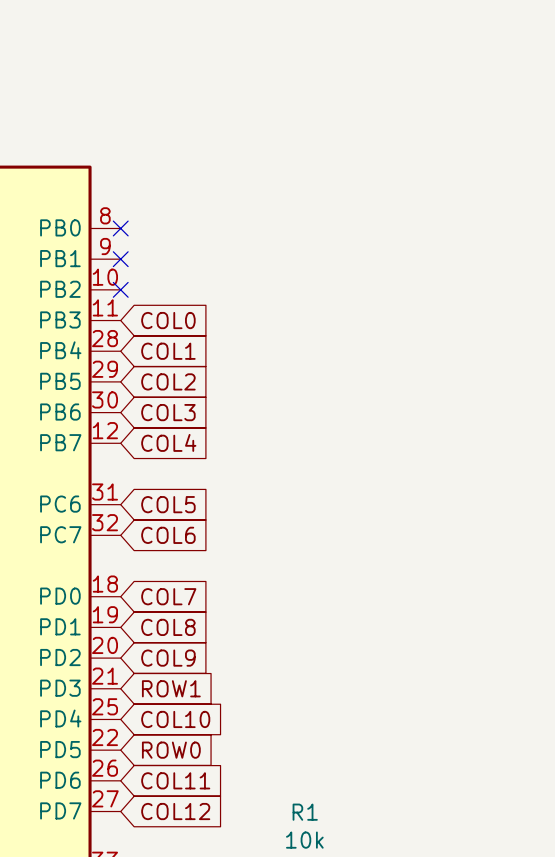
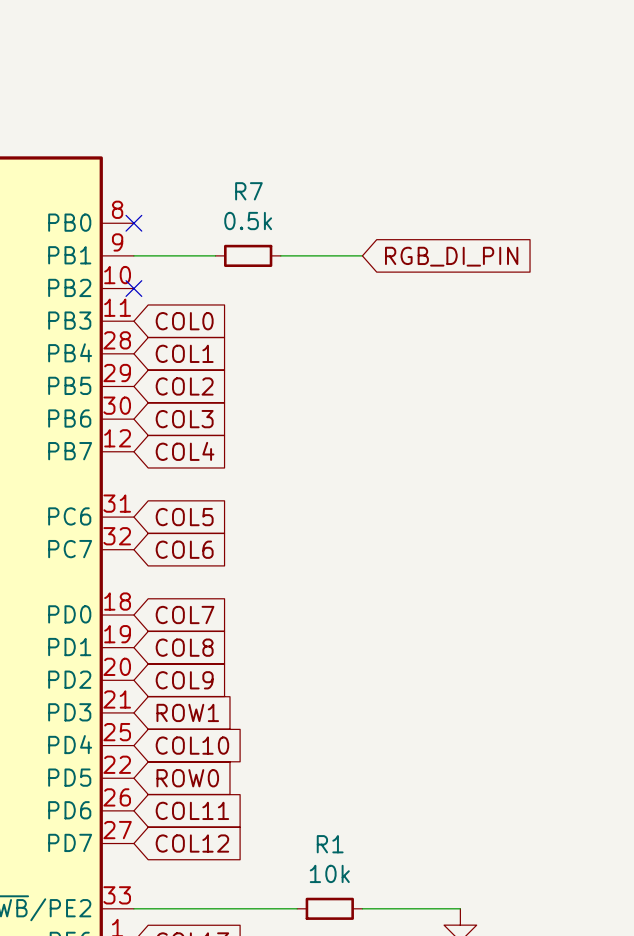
wire: none -> (133, 255) (215, 255)
no-connect mark: (120, 259) -> none
R7: none -> 0.5k (248, 255)
wire: none -> (280, 255) (362, 255)
global label: none -> RGB_DI_PIN (451, 256)

